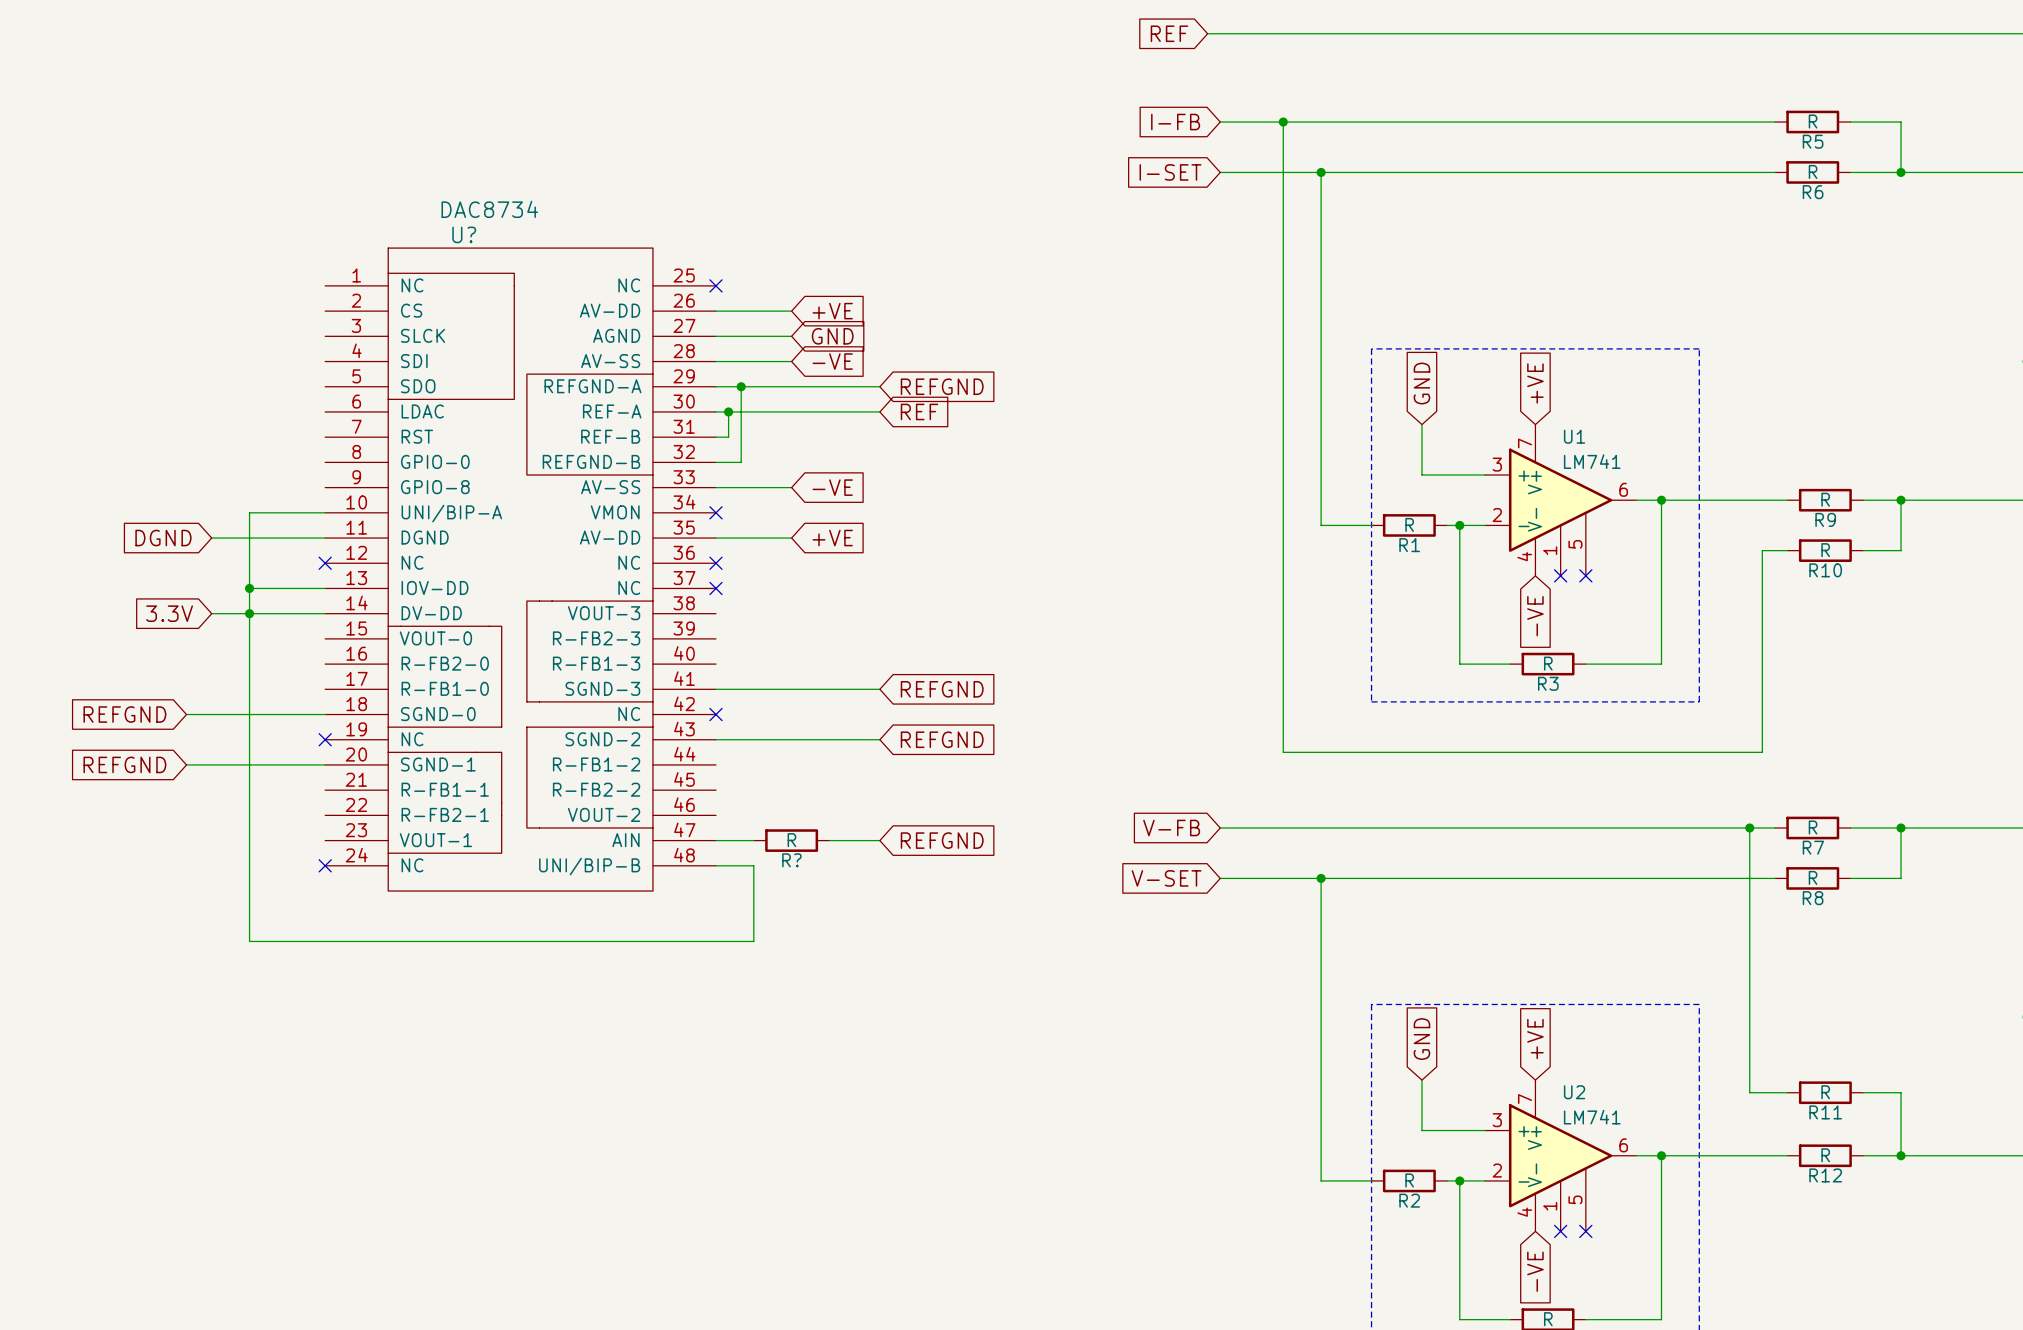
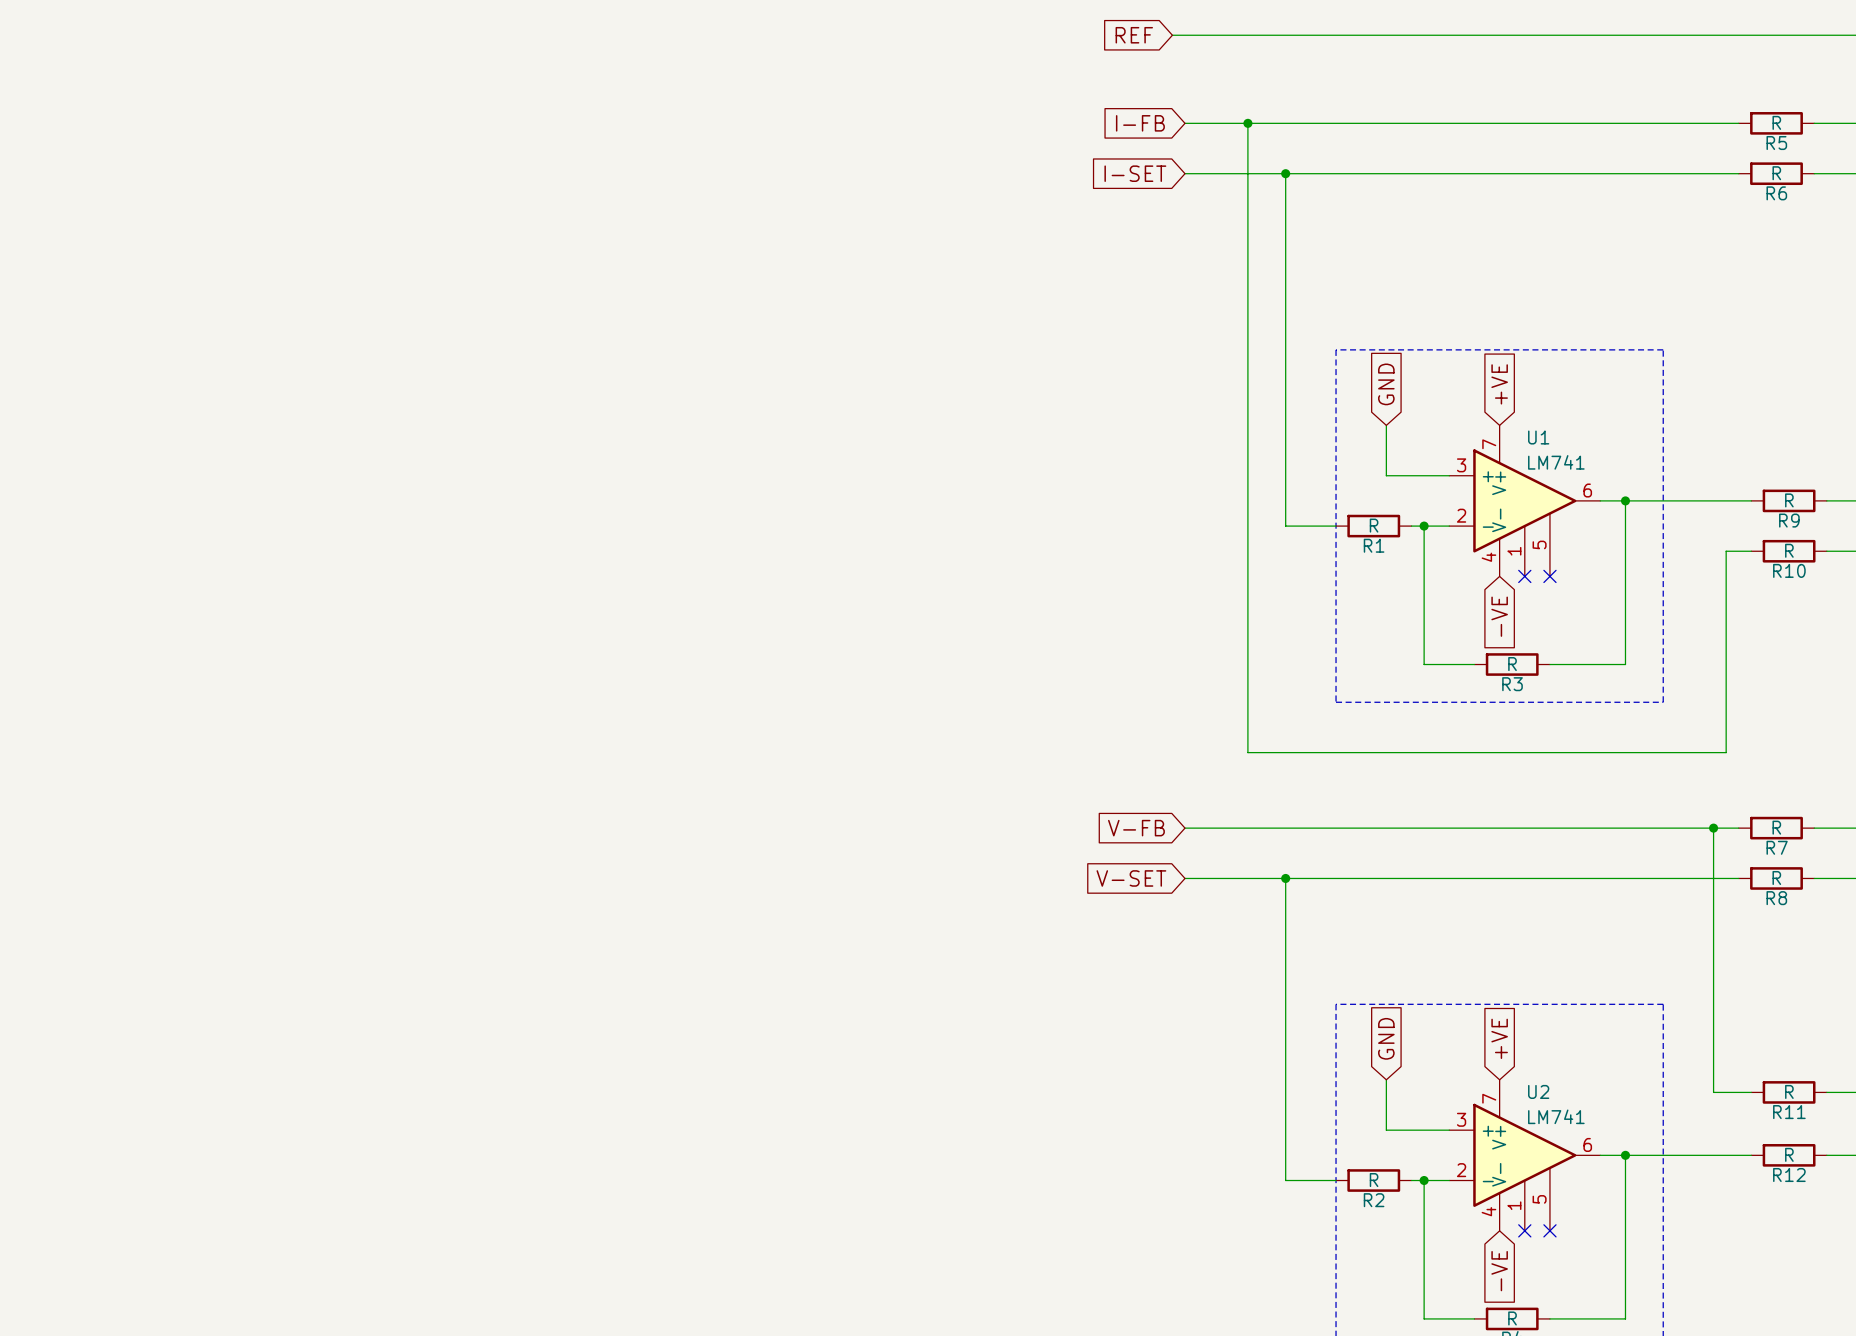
no-connect mark: (715, 285) -> none
wire: (715, 311) (791, 311) -> none
global label: +VE (832, 311) -> none
wire: (715, 336) (791, 336) -> none
global label: GND (832, 336) -> none
wire: (715, 361) (791, 361) -> none
global label: -VE (832, 361) -> none
wire: (715, 386) (879, 386) -> none
wire: (741, 386) (741, 462) (715, 462) -> none
junction: (741, 386) -> none
global label: REFGND (942, 386) -> none
wire: (715, 411) (879, 411) -> none
wire: (728, 411) (728, 437) (715, 437) -> none
junction: (728, 411) -> none
global label: REF (919, 411) -> none
wire: (715, 487) (791, 487) -> none
global label: -VE (832, 487) -> none
wire: (325, 512) (249, 512) (249, 941) (753, 941) (753, 865) (715, 865) -> none
no-connect mark: (715, 512) -> none
global label: DGND (163, 538) -> none
wire: (211, 538) (325, 538) -> none
wire: (715, 538) (791, 538) -> none
global label: +VE (832, 538) -> none
no-connect mark: (325, 563) -> none
no-connect mark: (715, 563) -> none
U?: DAC8734 (520, 569) -> none
wire: (249, 588) (325, 588) -> none
junction: (249, 588) -> none
no-connect mark: (715, 588) -> none
global label: 3.3V (169, 613) -> none
wire: (211, 613) (325, 613) -> none
junction: (249, 613) -> none
wire: (715, 689) (879, 689) -> none
global label: REFGND (942, 689) -> none
global label: REFGND (124, 714) -> none
wire: (186, 714) (325, 714) -> none
no-connect mark: (715, 714) -> none
no-connect mark: (325, 739) -> none
wire: (715, 739) (879, 739) -> none
global label: REFGND (942, 739) -> none
global label: REFGND (124, 764) -> none
wire: (186, 764) (325, 764) -> none
wire: (715, 840) (753, 840) -> none
R?: R (791, 840) -> none
wire: (829, 840) (879, 840) -> none
global label: REFGND (942, 840) -> none
no-connect mark: (325, 865) -> none

